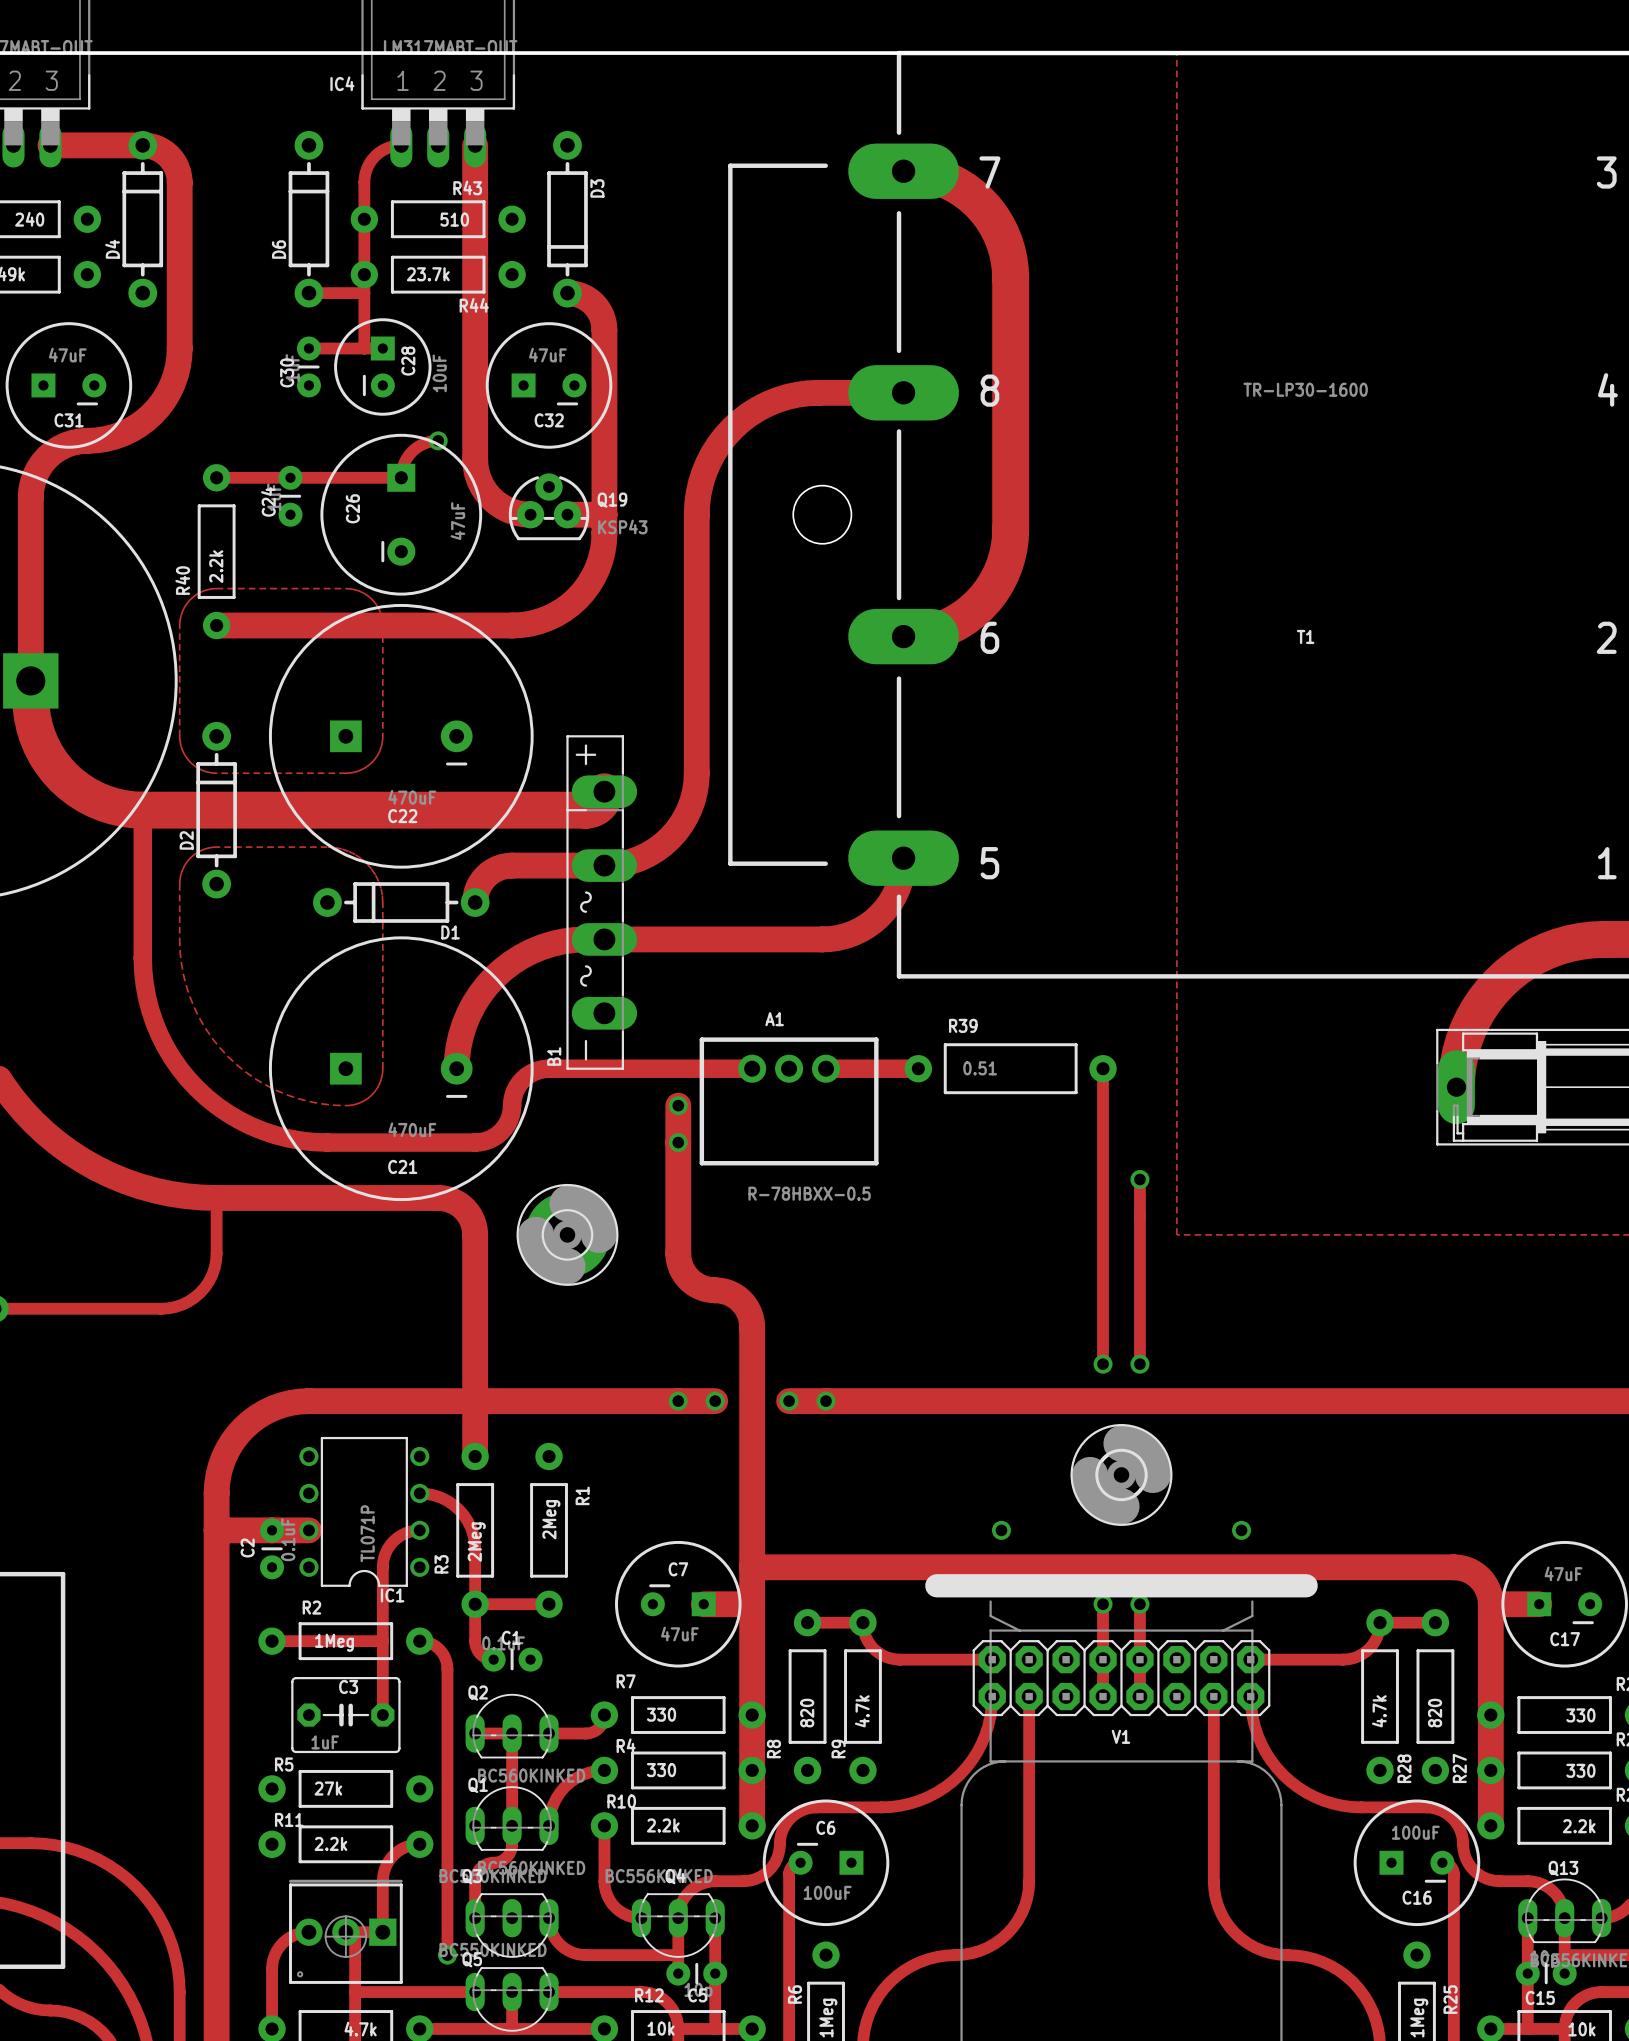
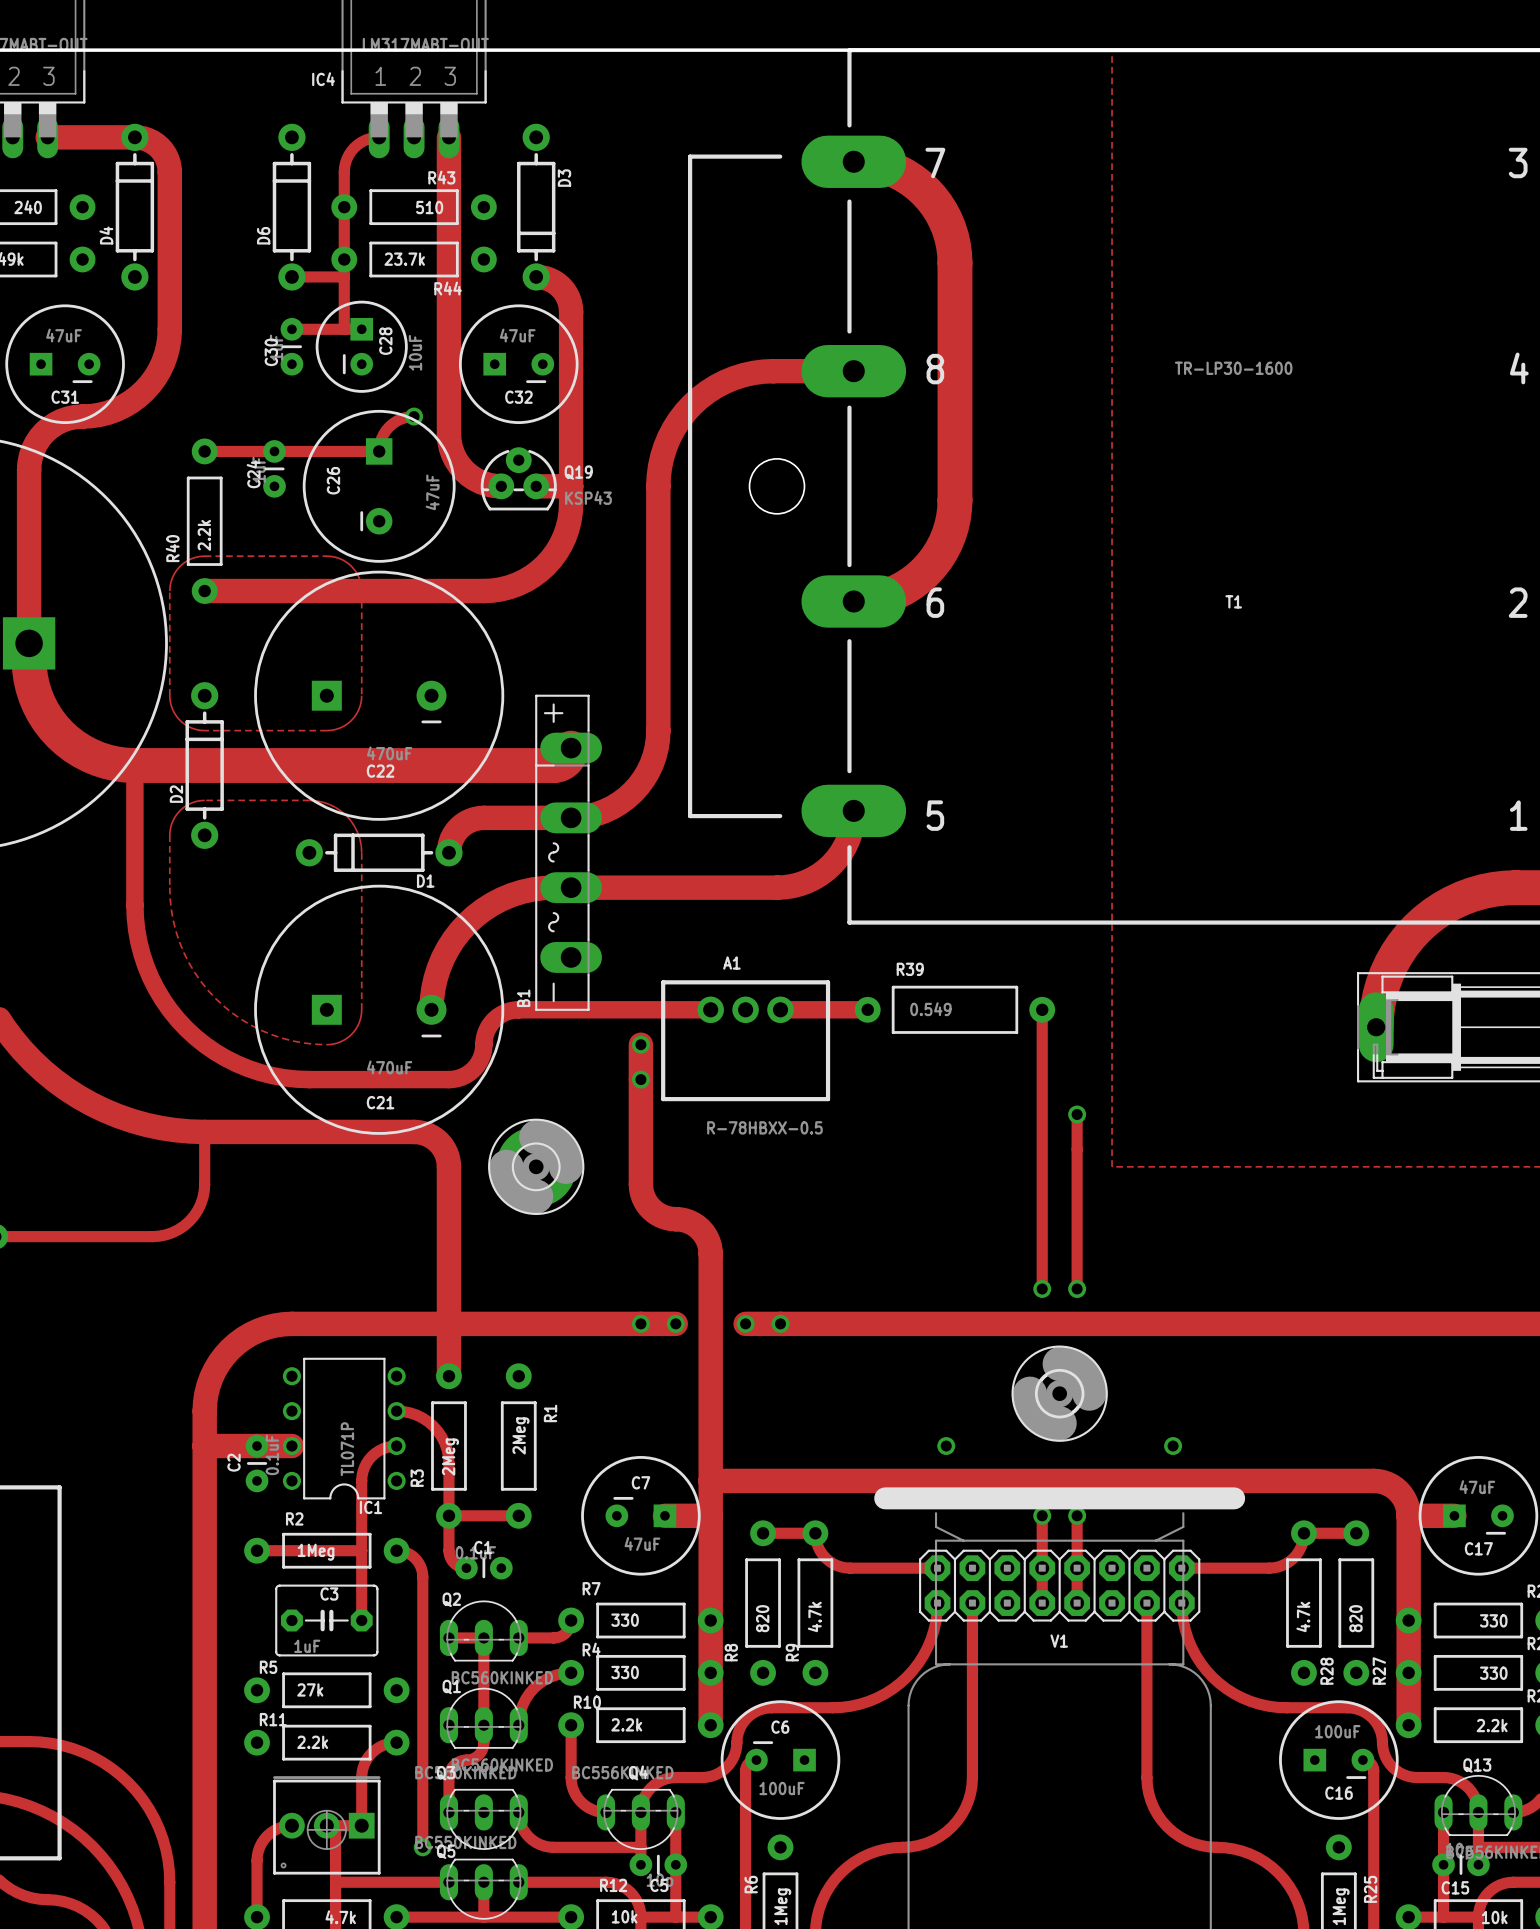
R39 value: 0.51 (980, 1068) -> 0.549 (930, 1009)

